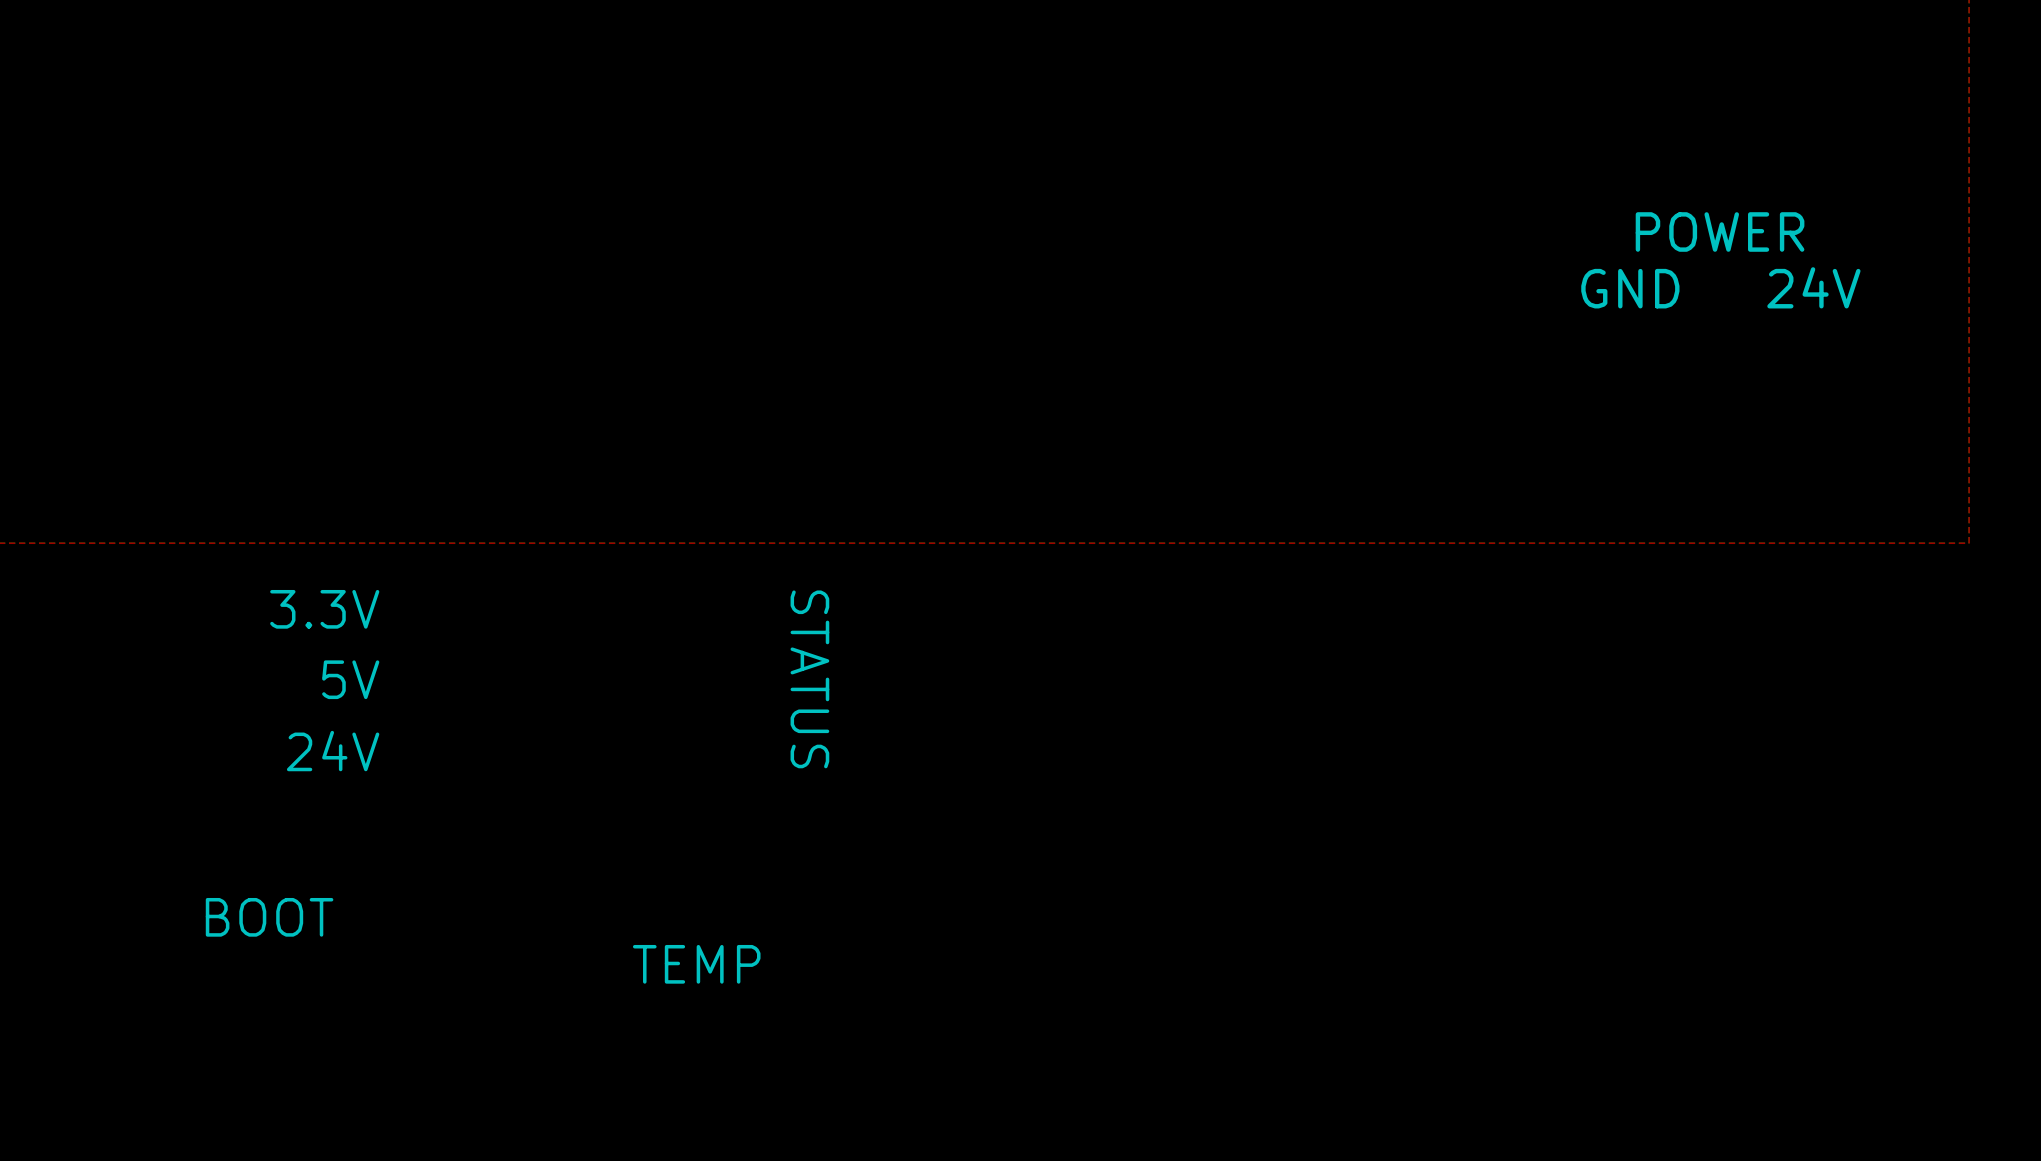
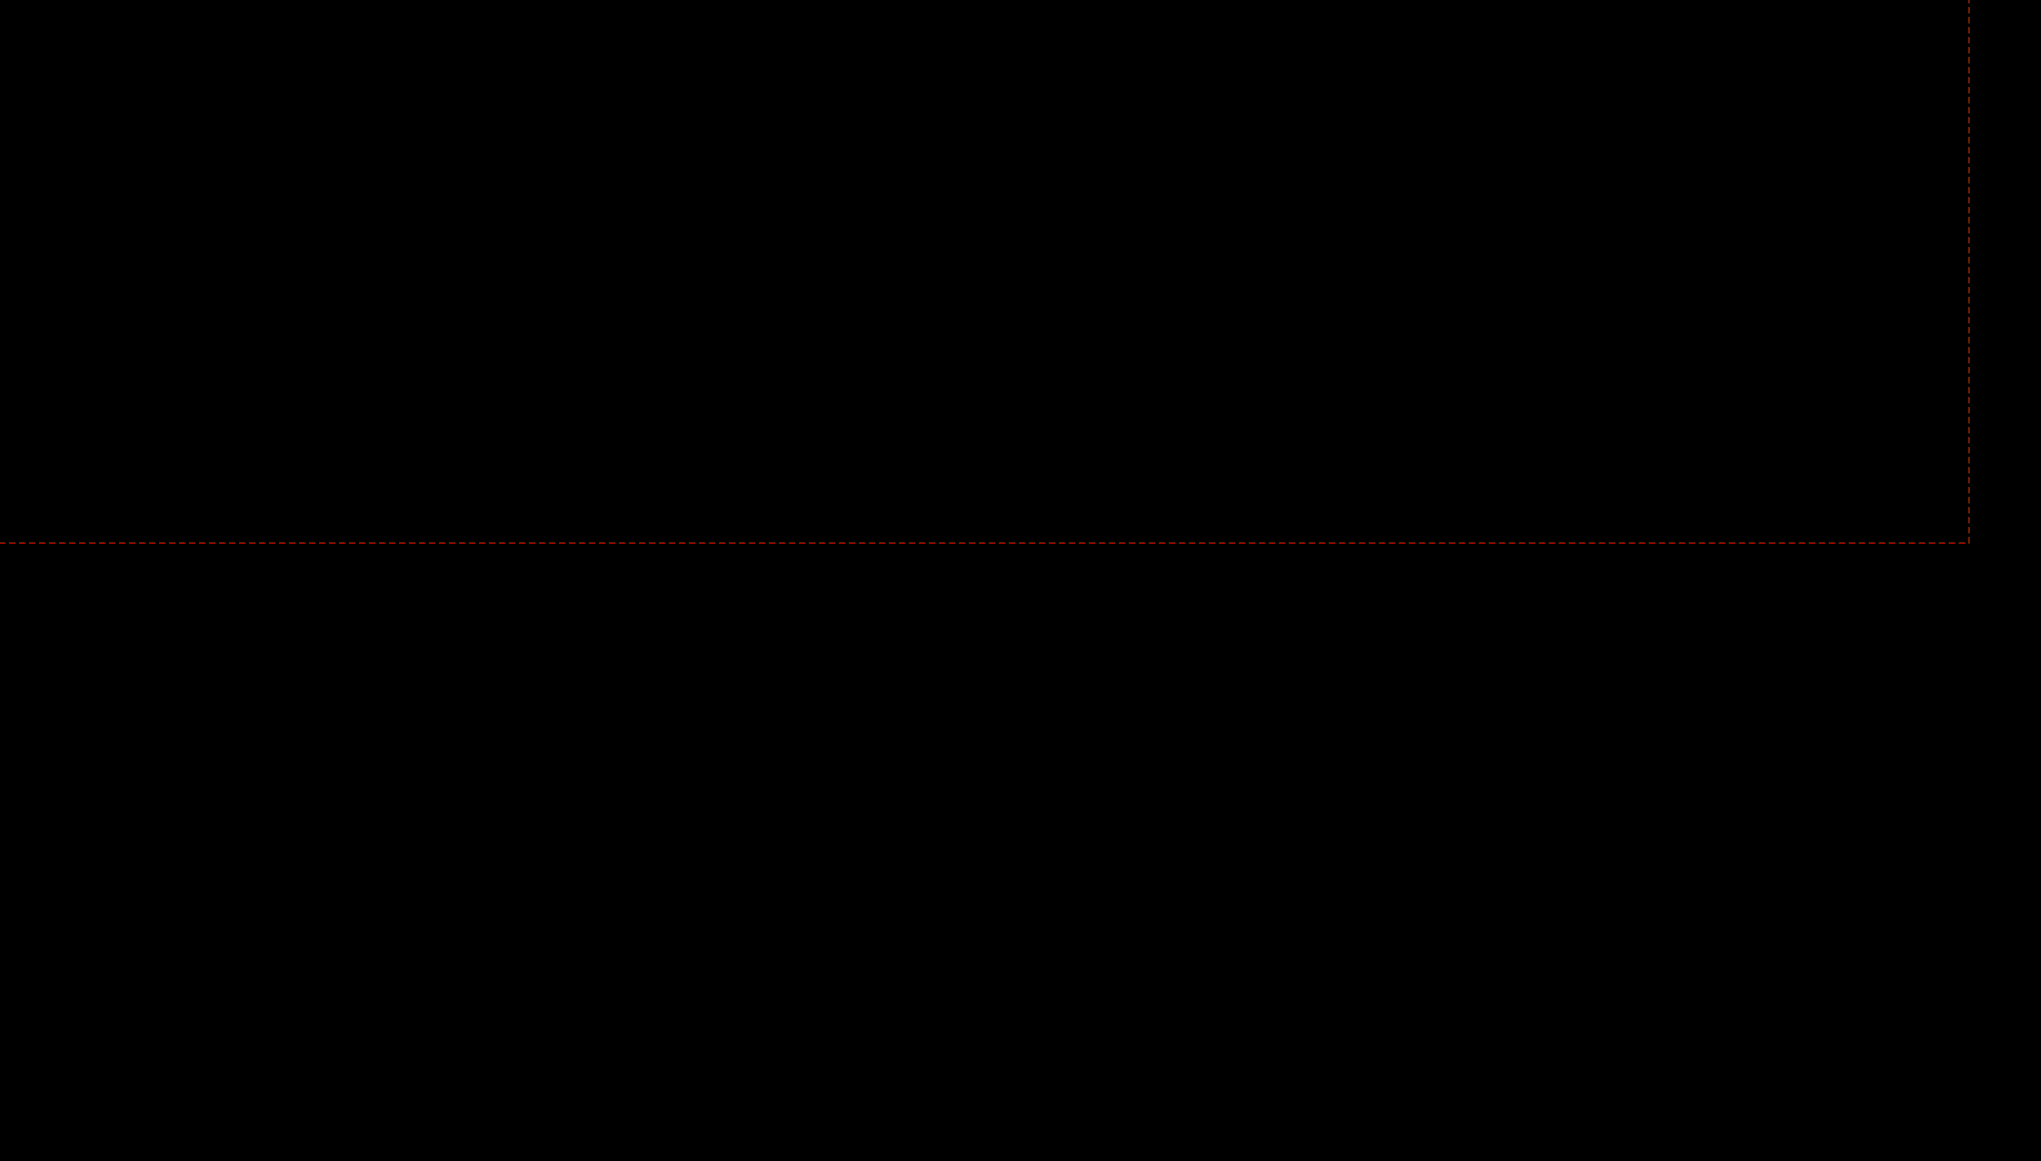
text: POWER (1720, 231) -> none
text: GND 24V (1720, 287) -> none
text: 3.3V (324, 609) -> none
text: 5V (350, 679) -> none
text: STATUS (809, 679) -> none
text: 24V (333, 751) -> none
text: BOOT (269, 917) -> none
text: TEMP (696, 964) -> none

